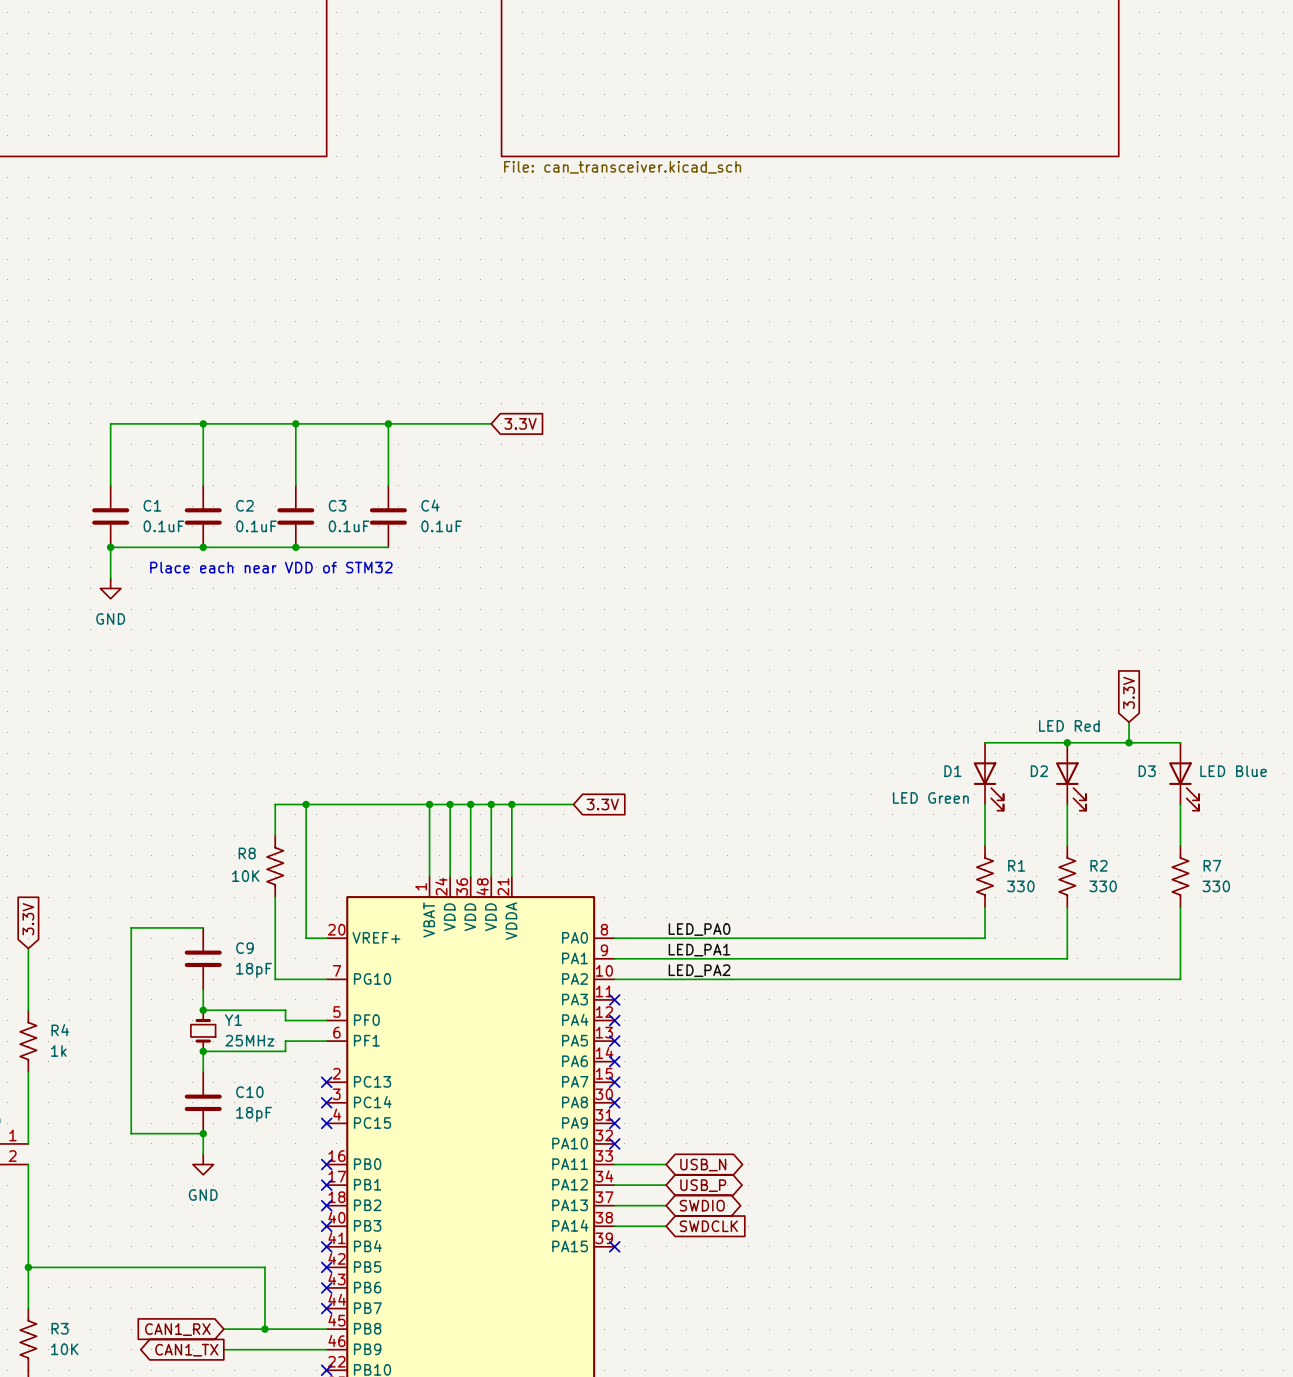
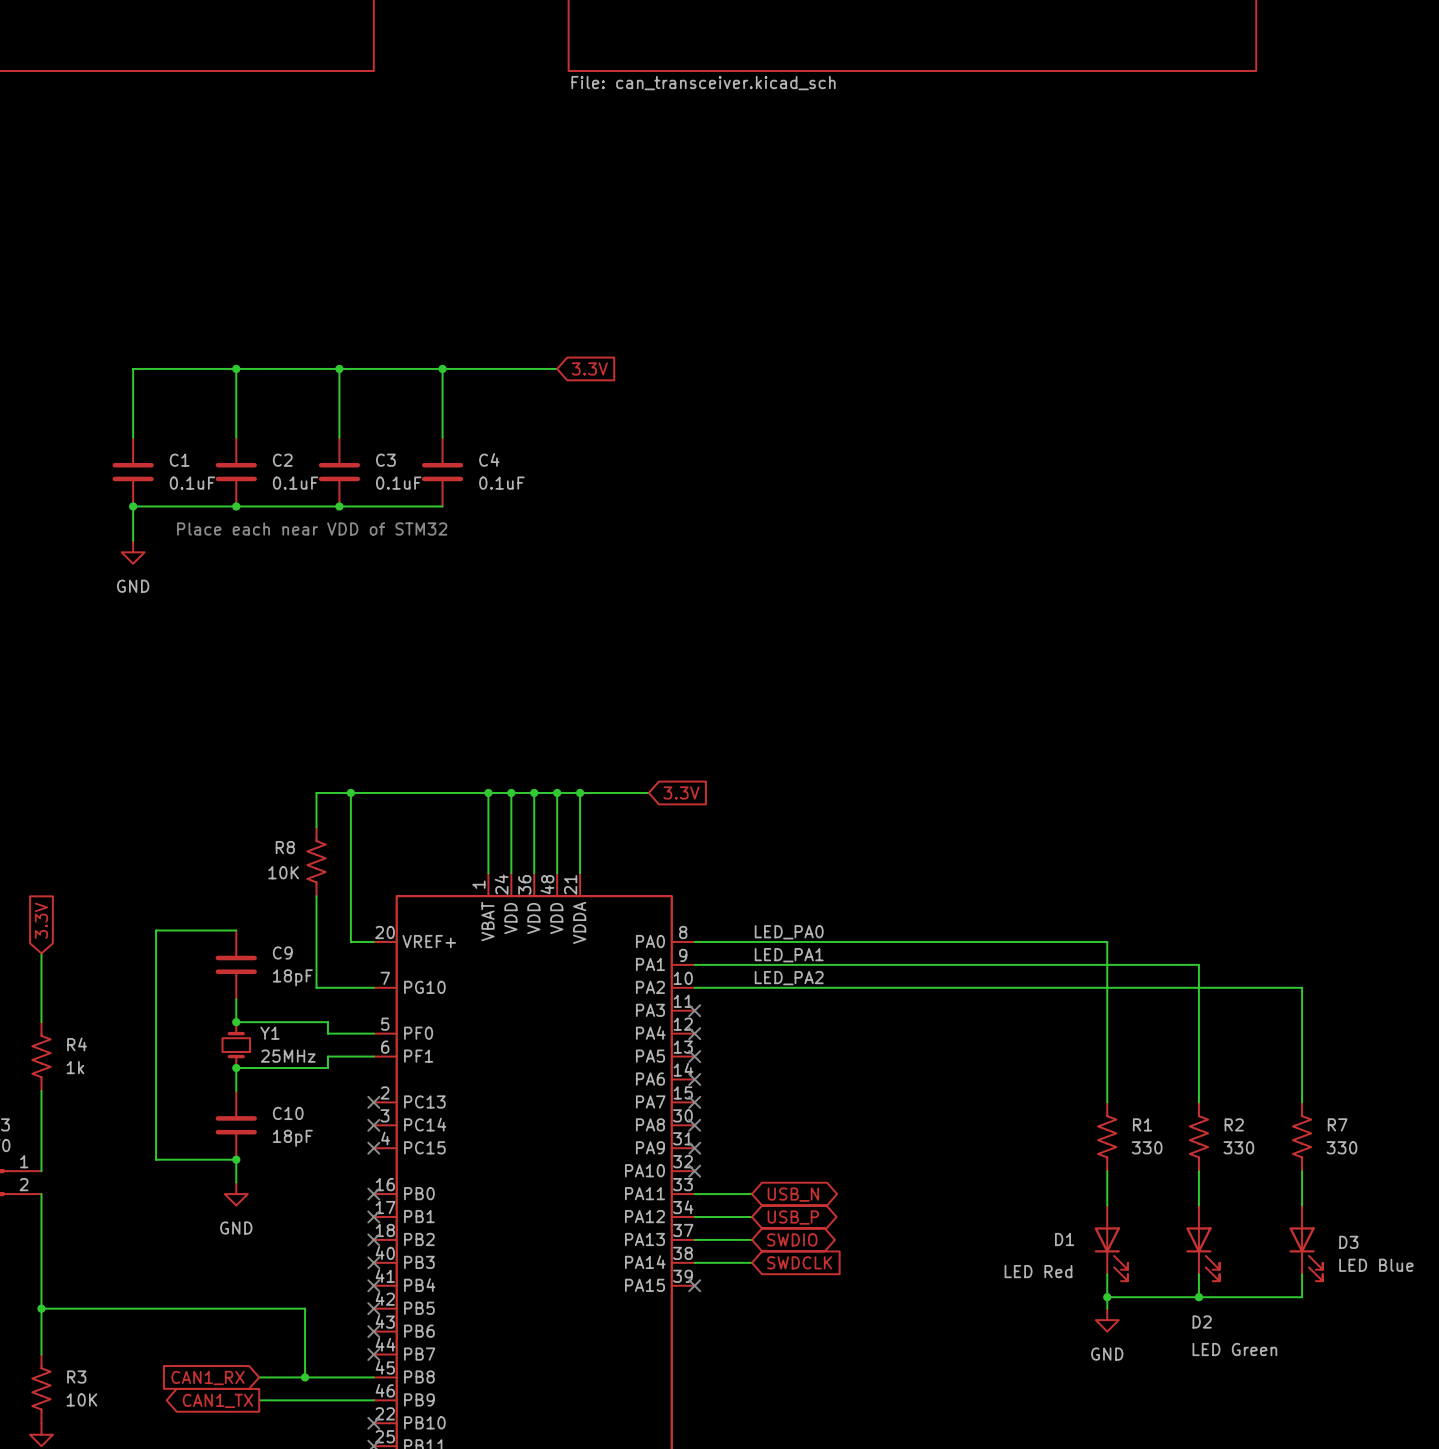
global label: 3.3V (1129, 692) -> none
wire: (1129, 722) (1129, 742) -> none
D1 value position: LED Red (1069, 725) -> LED Red (1038, 1271)
wire: (985, 742) (1180, 742) -> none
junction: (1067, 742) -> none
junction: (1129, 742) -> none
D1 name position: D1 (952, 771) -> D1 (1064, 1239)
D2 name position: D2 (1039, 771) -> D2 (1202, 1322)
D3 name position: D3 (1147, 771) -> D3 (1348, 1242)
D3 value position: LED Blue (1233, 771) -> LED Blue (1376, 1265)
D1 position: (988, 776) -> (1111, 1243)
D2 position: (1070, 776) -> (1202, 1243)
D3 position: (1184, 776) -> (1306, 1243)
D2 value position: LED Green (930, 797) -> LED Green (1234, 1349)
wire: (985, 804) (985, 845) -> none
wire: (1067, 804) (1067, 845) -> none
wire: (1180, 804) (1180, 845) -> none
R1 position: (985, 876) -> (1107, 1136)
R2 position: (1067, 876) -> (1198, 1136)
R7 position: (1180, 876) -> (1302, 1136)
wire: (985, 907) (985, 938) -> (1107, 1102) (1107, 941)
wire: (1067, 907) (1067, 958) -> (1198, 1102) (1198, 964)
wire: (1180, 907) (1180, 979) (1159, 979) -> (1302, 1102) (1302, 987)
wire: none -> (1107, 1171) (1107, 1205)
wire: none -> (1198, 1171) (1198, 1205)
wire: none -> (1302, 1171) (1302, 1205)
wire: none -> (1107, 1274) (1107, 1308)
wire: none -> (1198, 1274) (1198, 1297)
wire: none -> (1302, 1274) (1302, 1297) (1107, 1297)
junction: none -> (1107, 1297)
junction: none -> (1198, 1297)
power symbol: none -> GND (1107, 1320)

